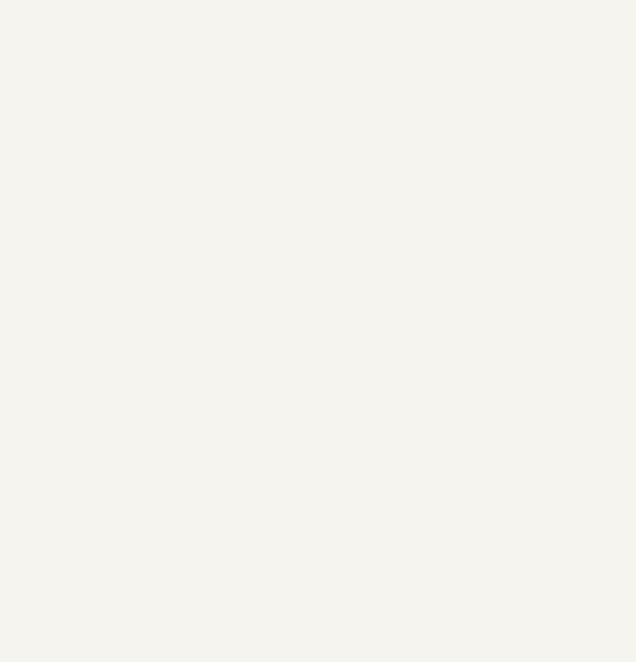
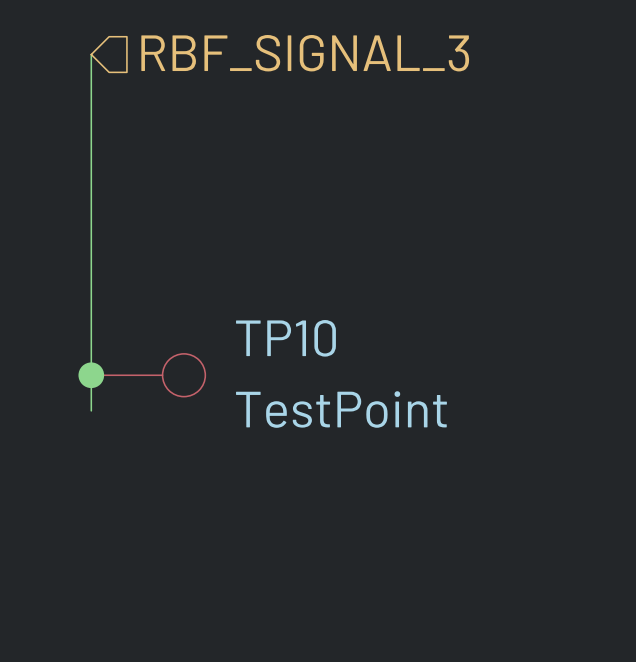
wire: none -> (91, 54) (91, 410)
hierarchical label: none -> RBF_SIGNAL_3 (305, 53)
junction: none -> (91, 375)
TP10: none -> TestPoint (148, 375)

